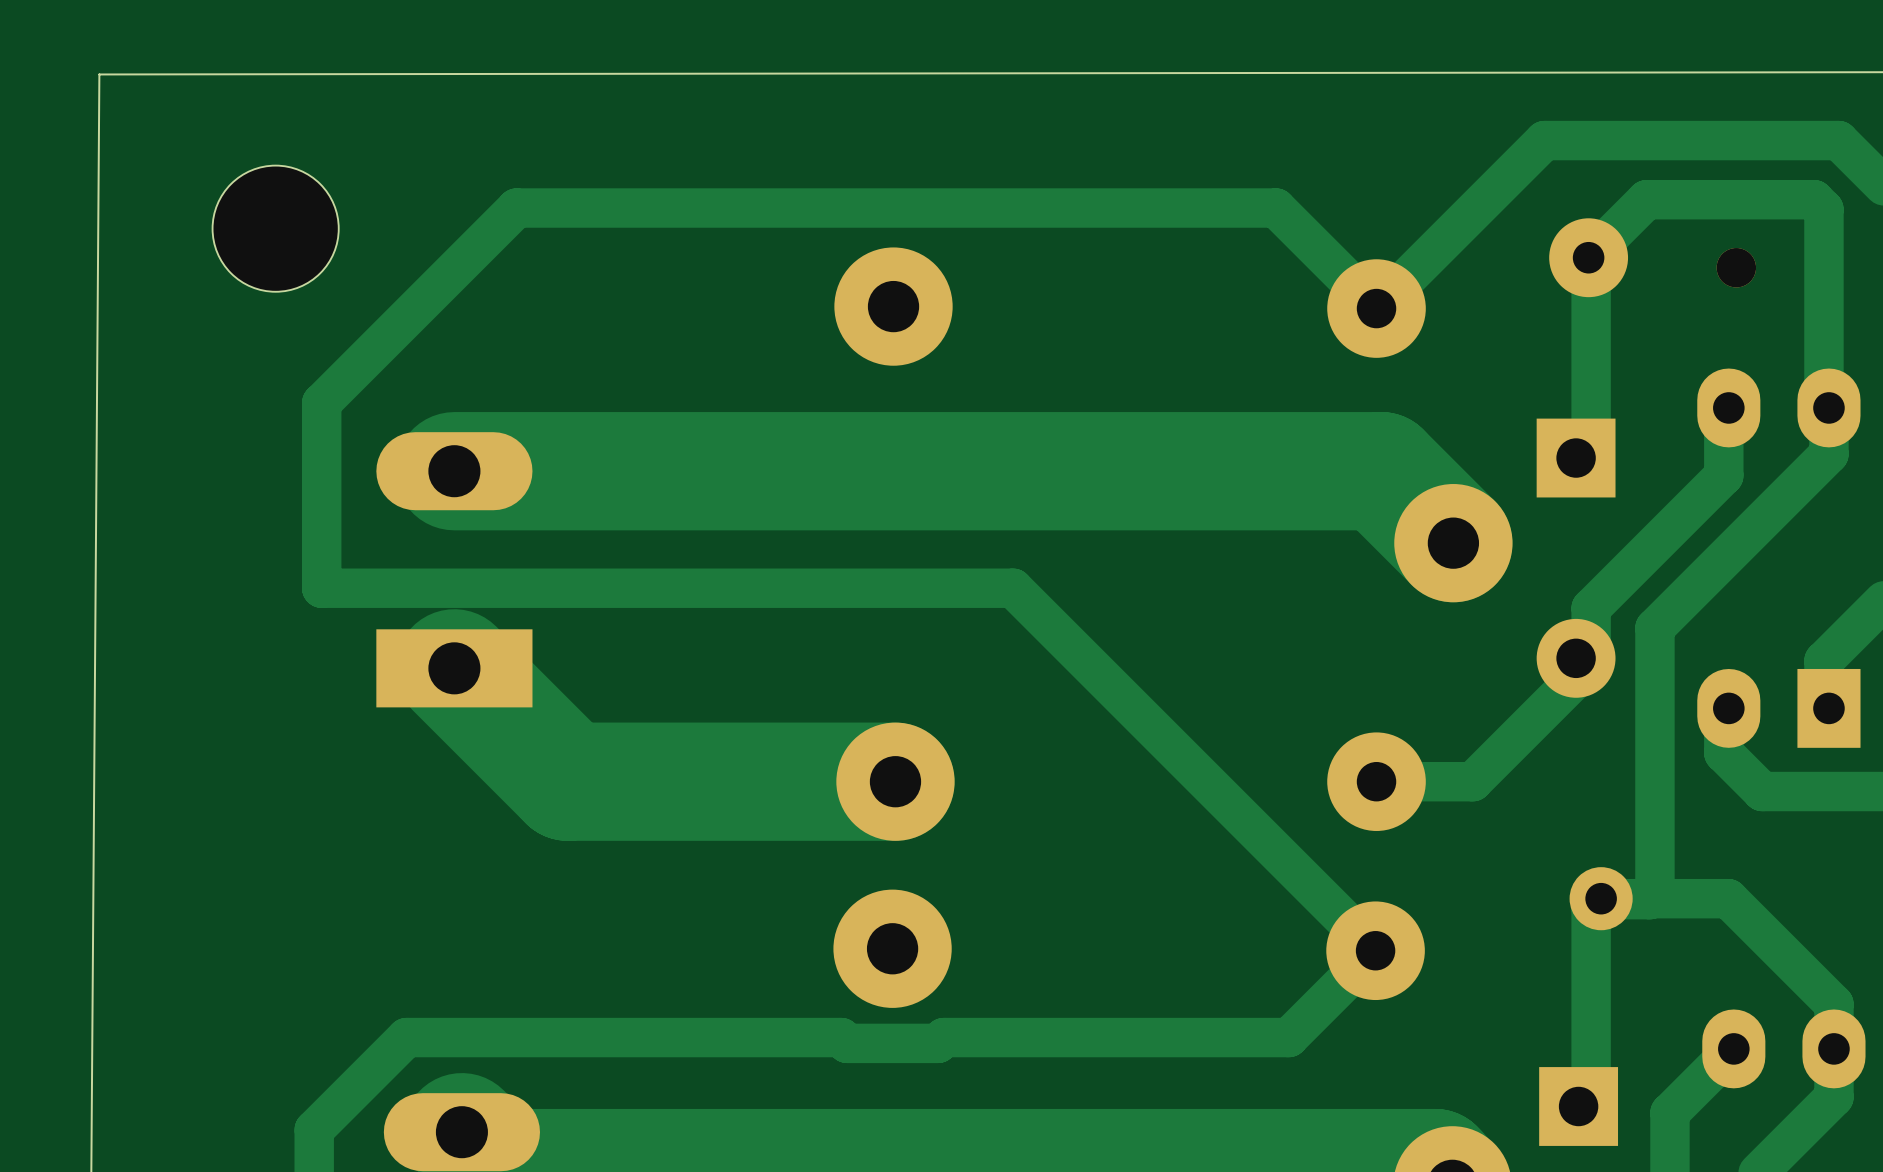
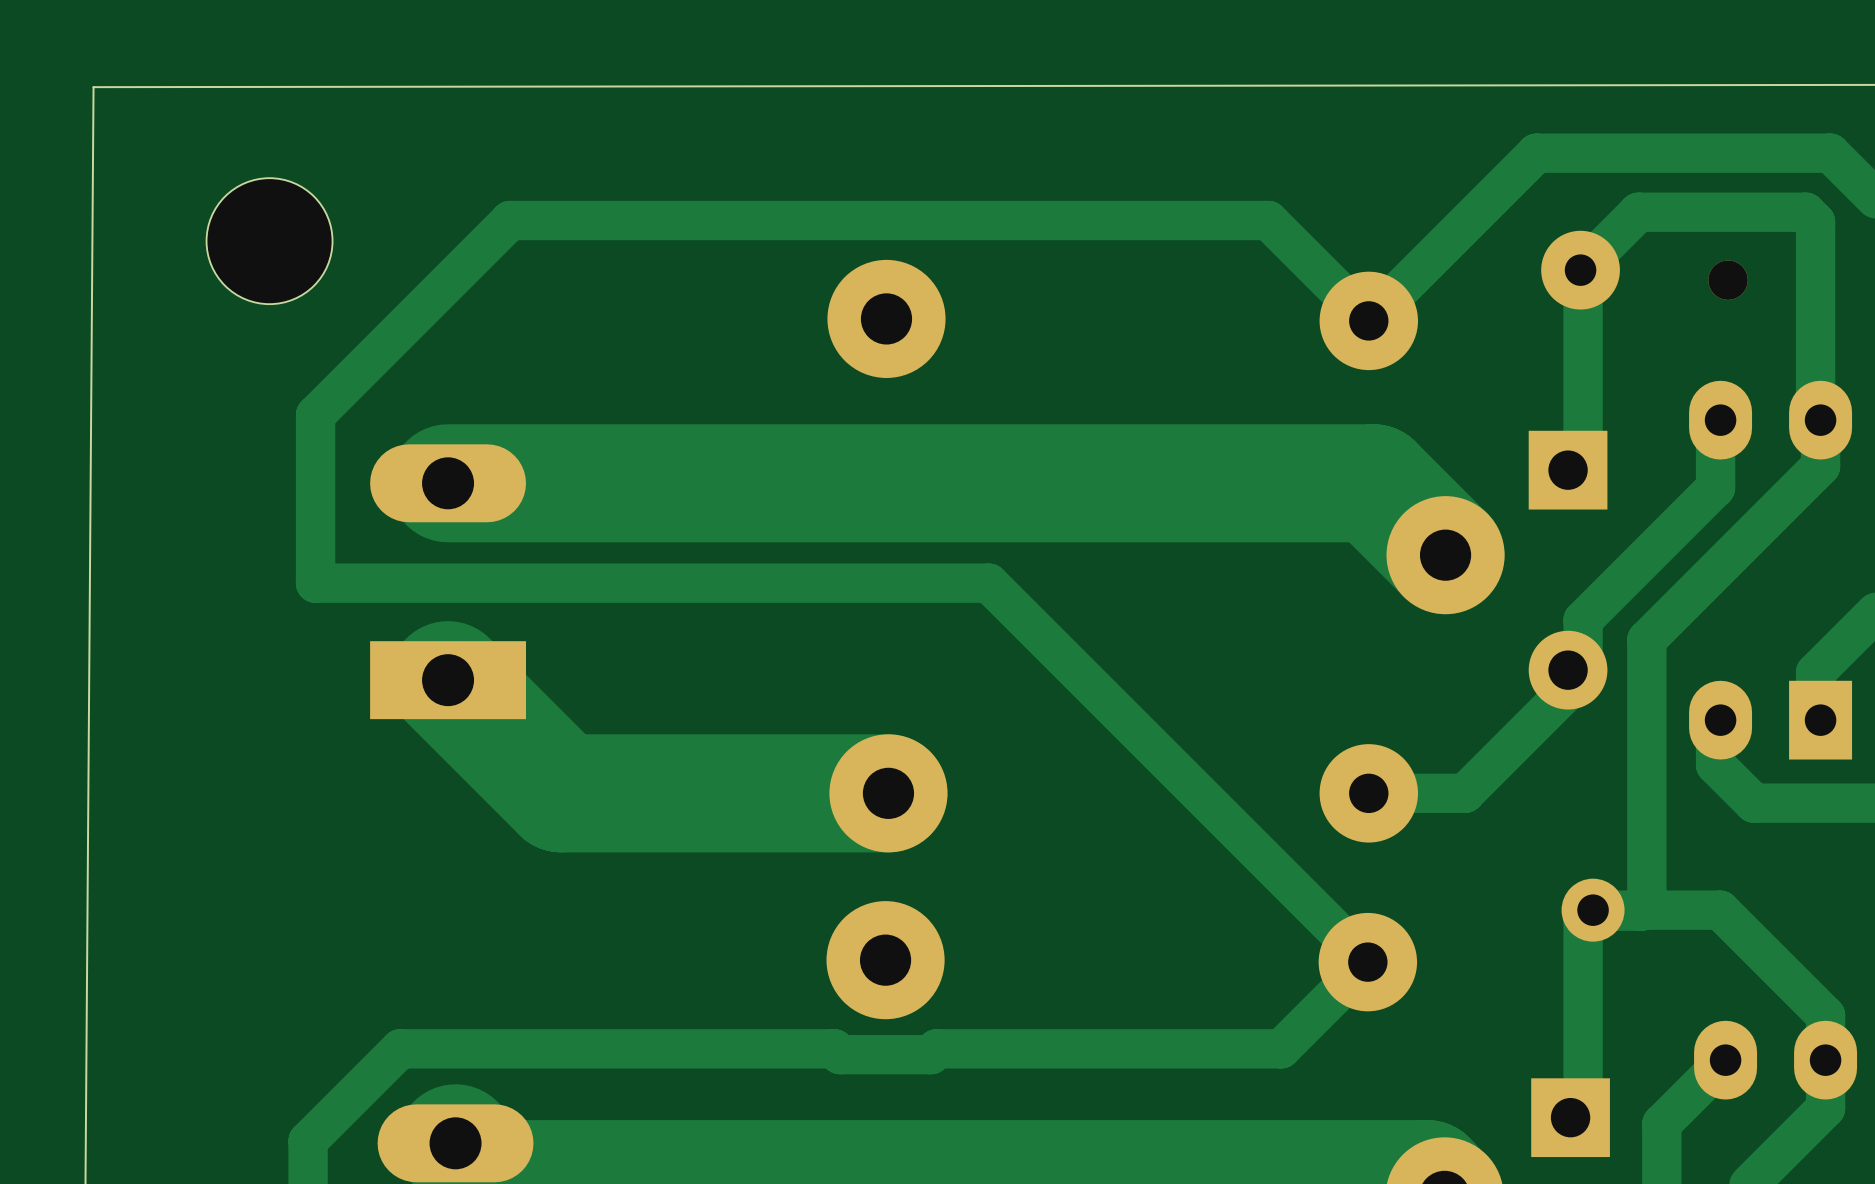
track: (321, 571) (321, 588) (1013, 588) -> (315, 583) (988, 583) (1005, 600)

